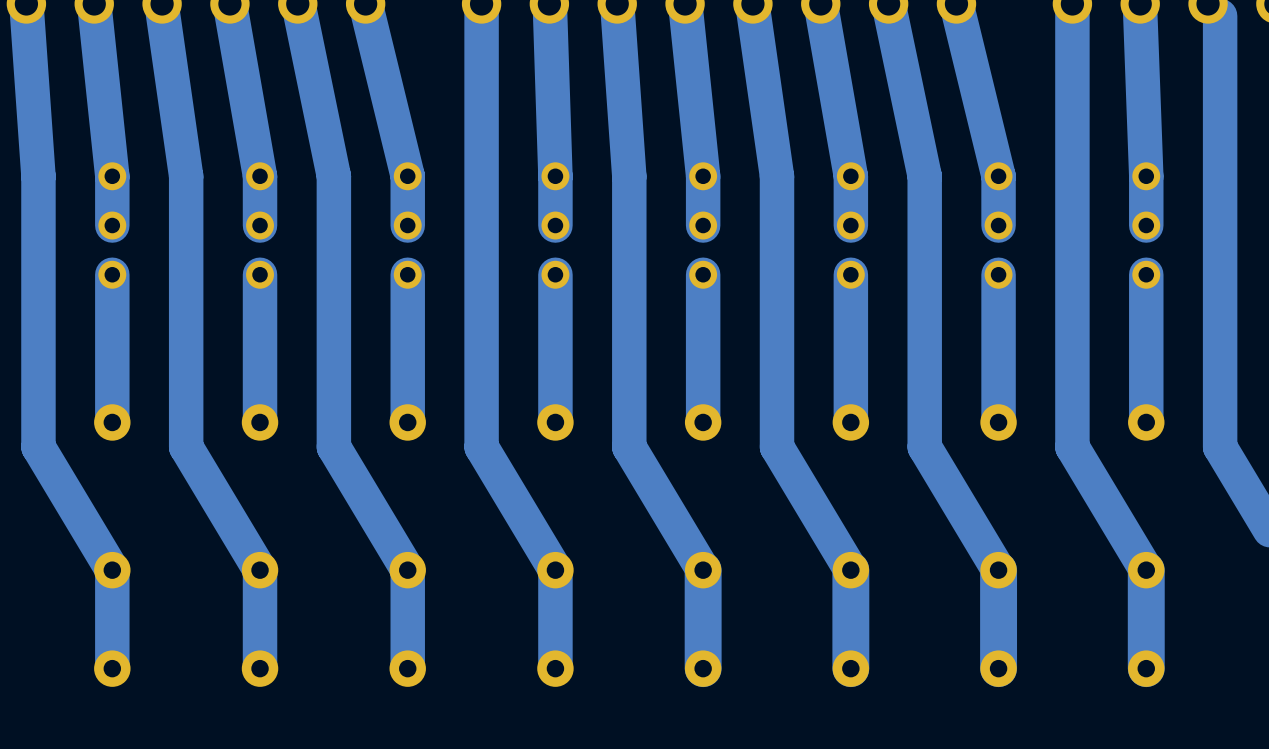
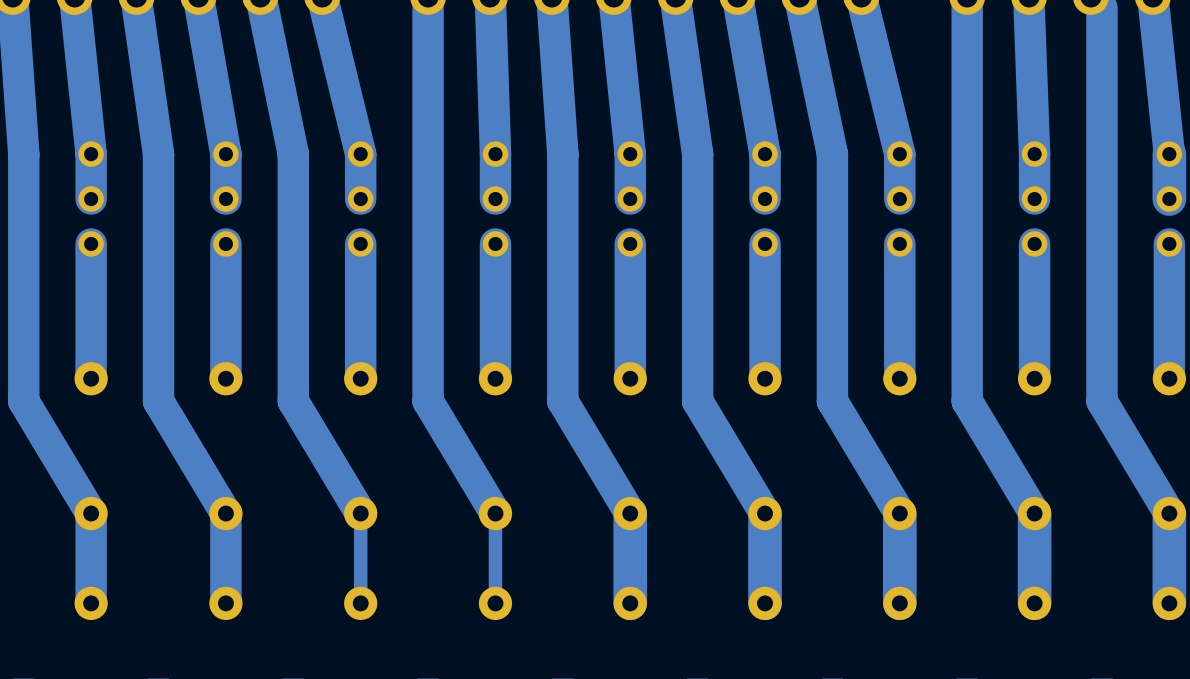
track width: thick (407, 570) (407, 668) -> thin (360, 513) (360, 603)
track width: thick (555, 570) (555, 668) -> thin (495, 513) (495, 603)

